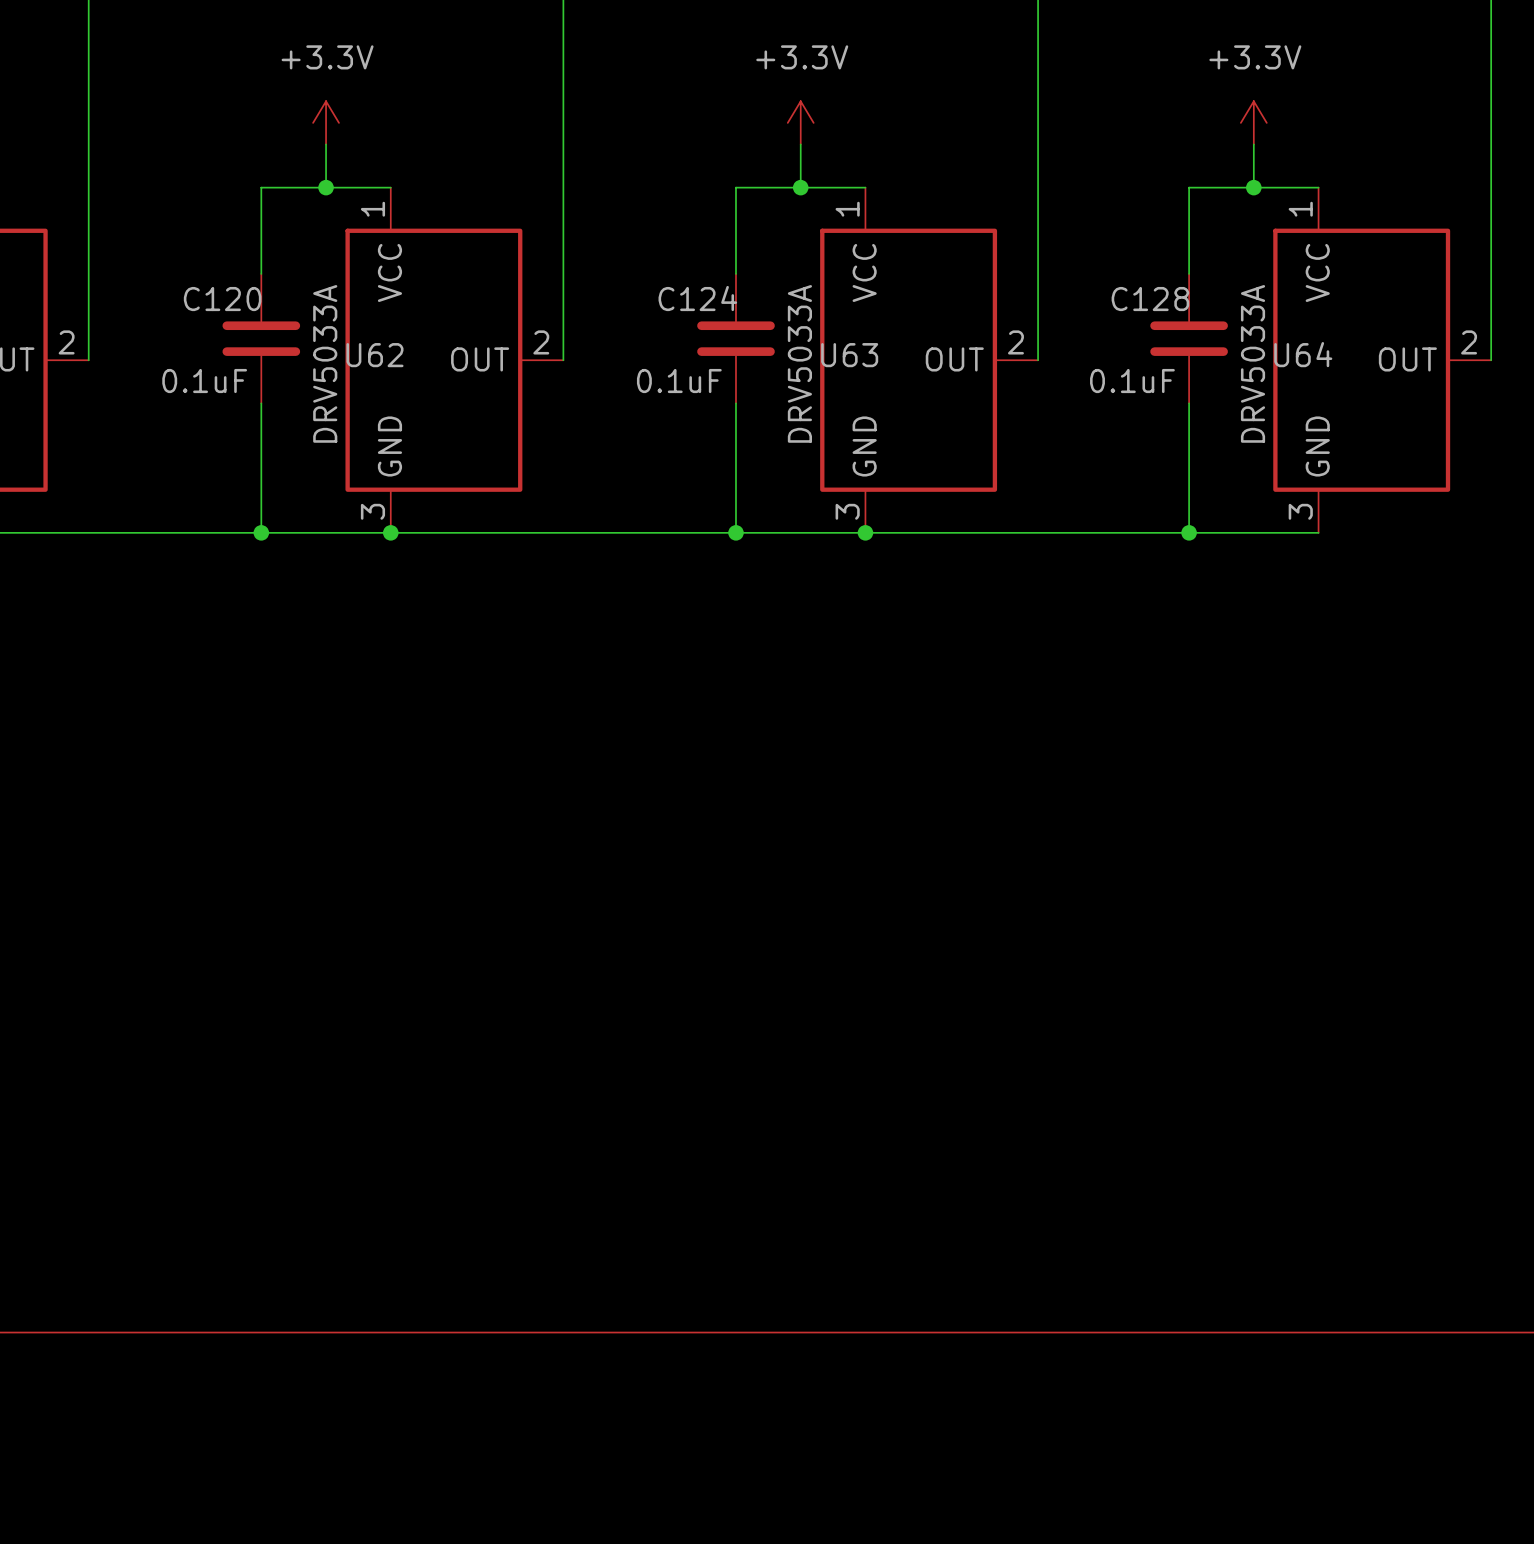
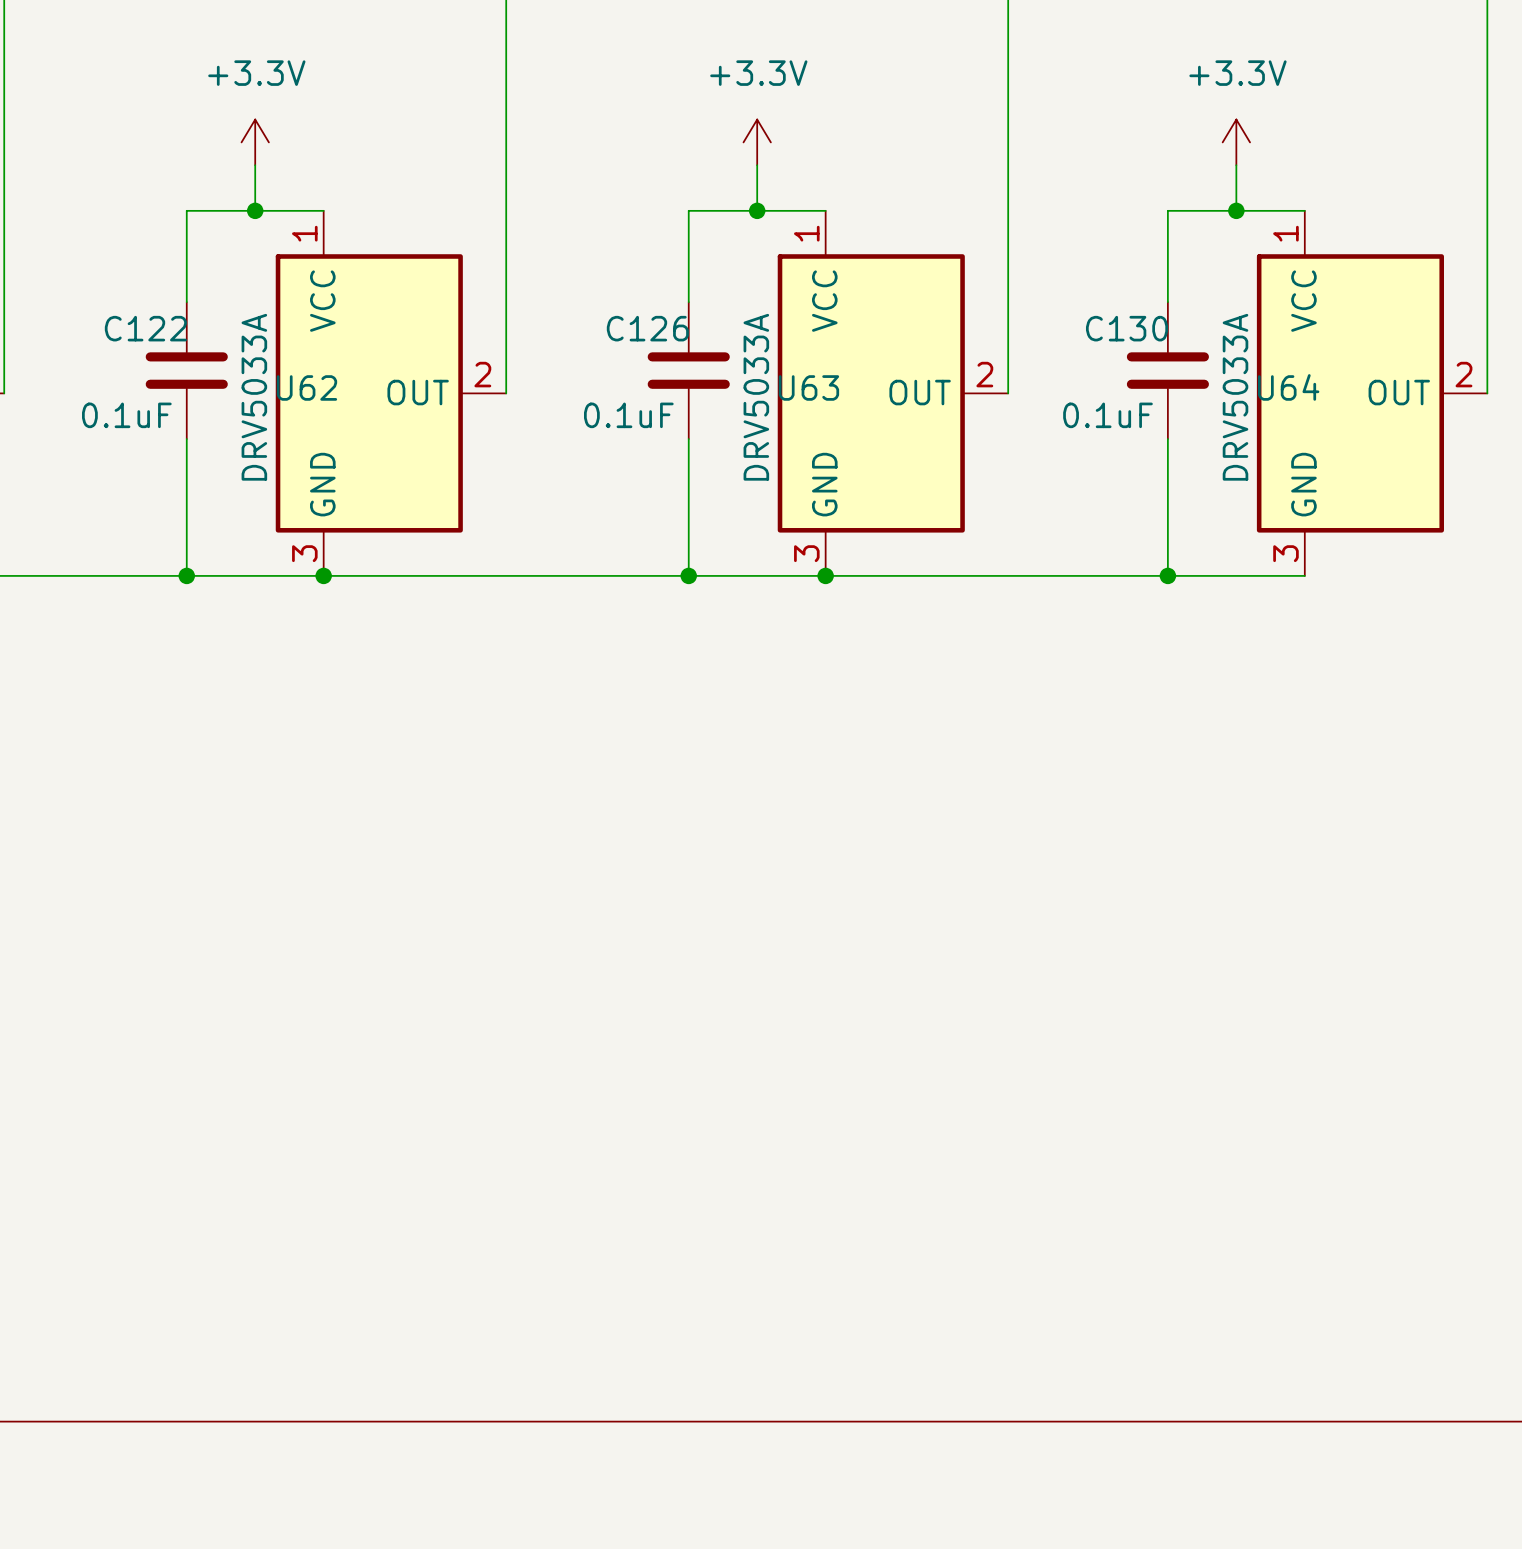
C124 name: C124 (697, 298) -> C126 (647, 328)
C120 name: C120 (222, 299) -> C122 (145, 328)
C128 name: C128 (1150, 299) -> C130 (1127, 328)

